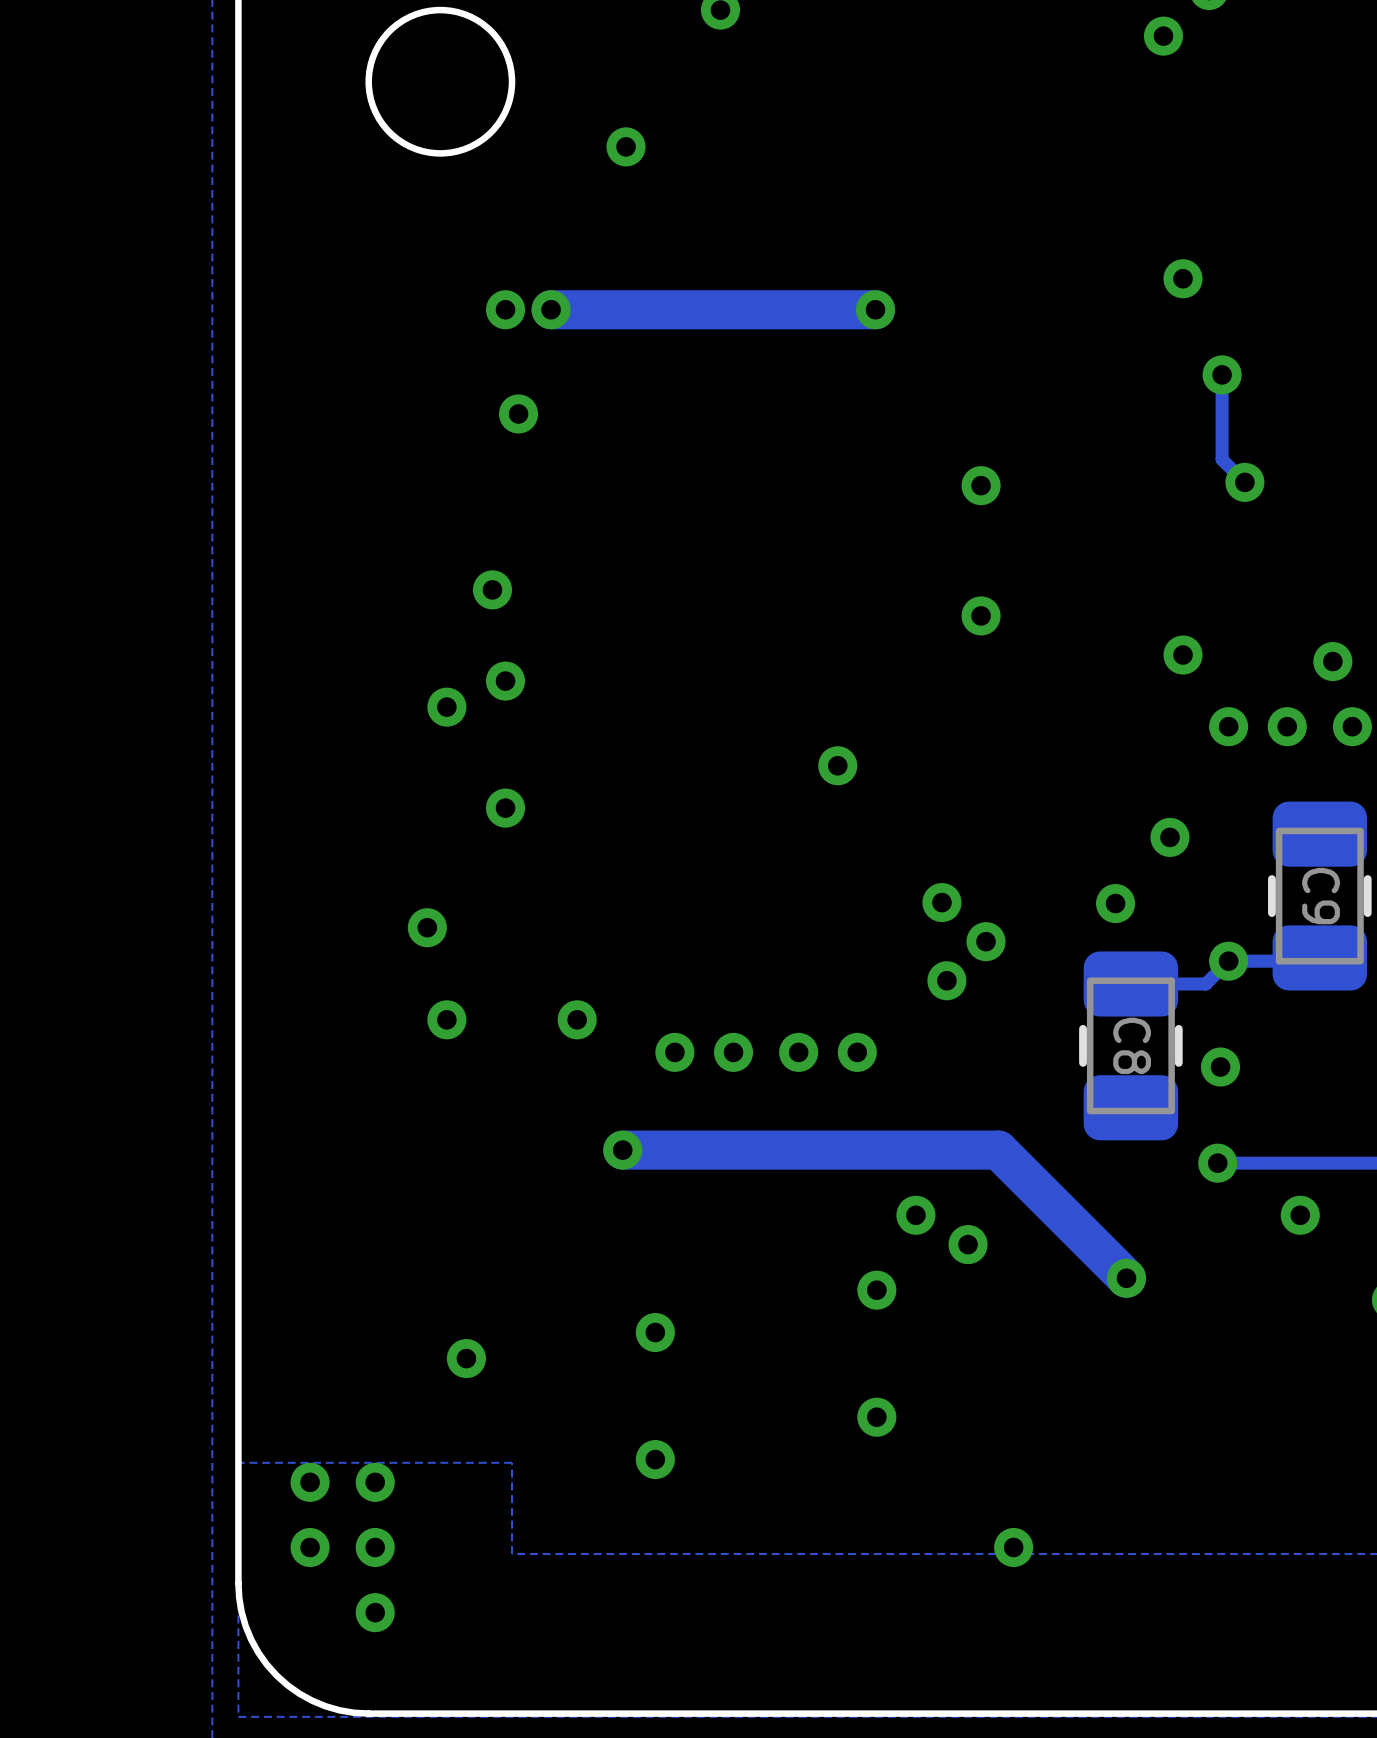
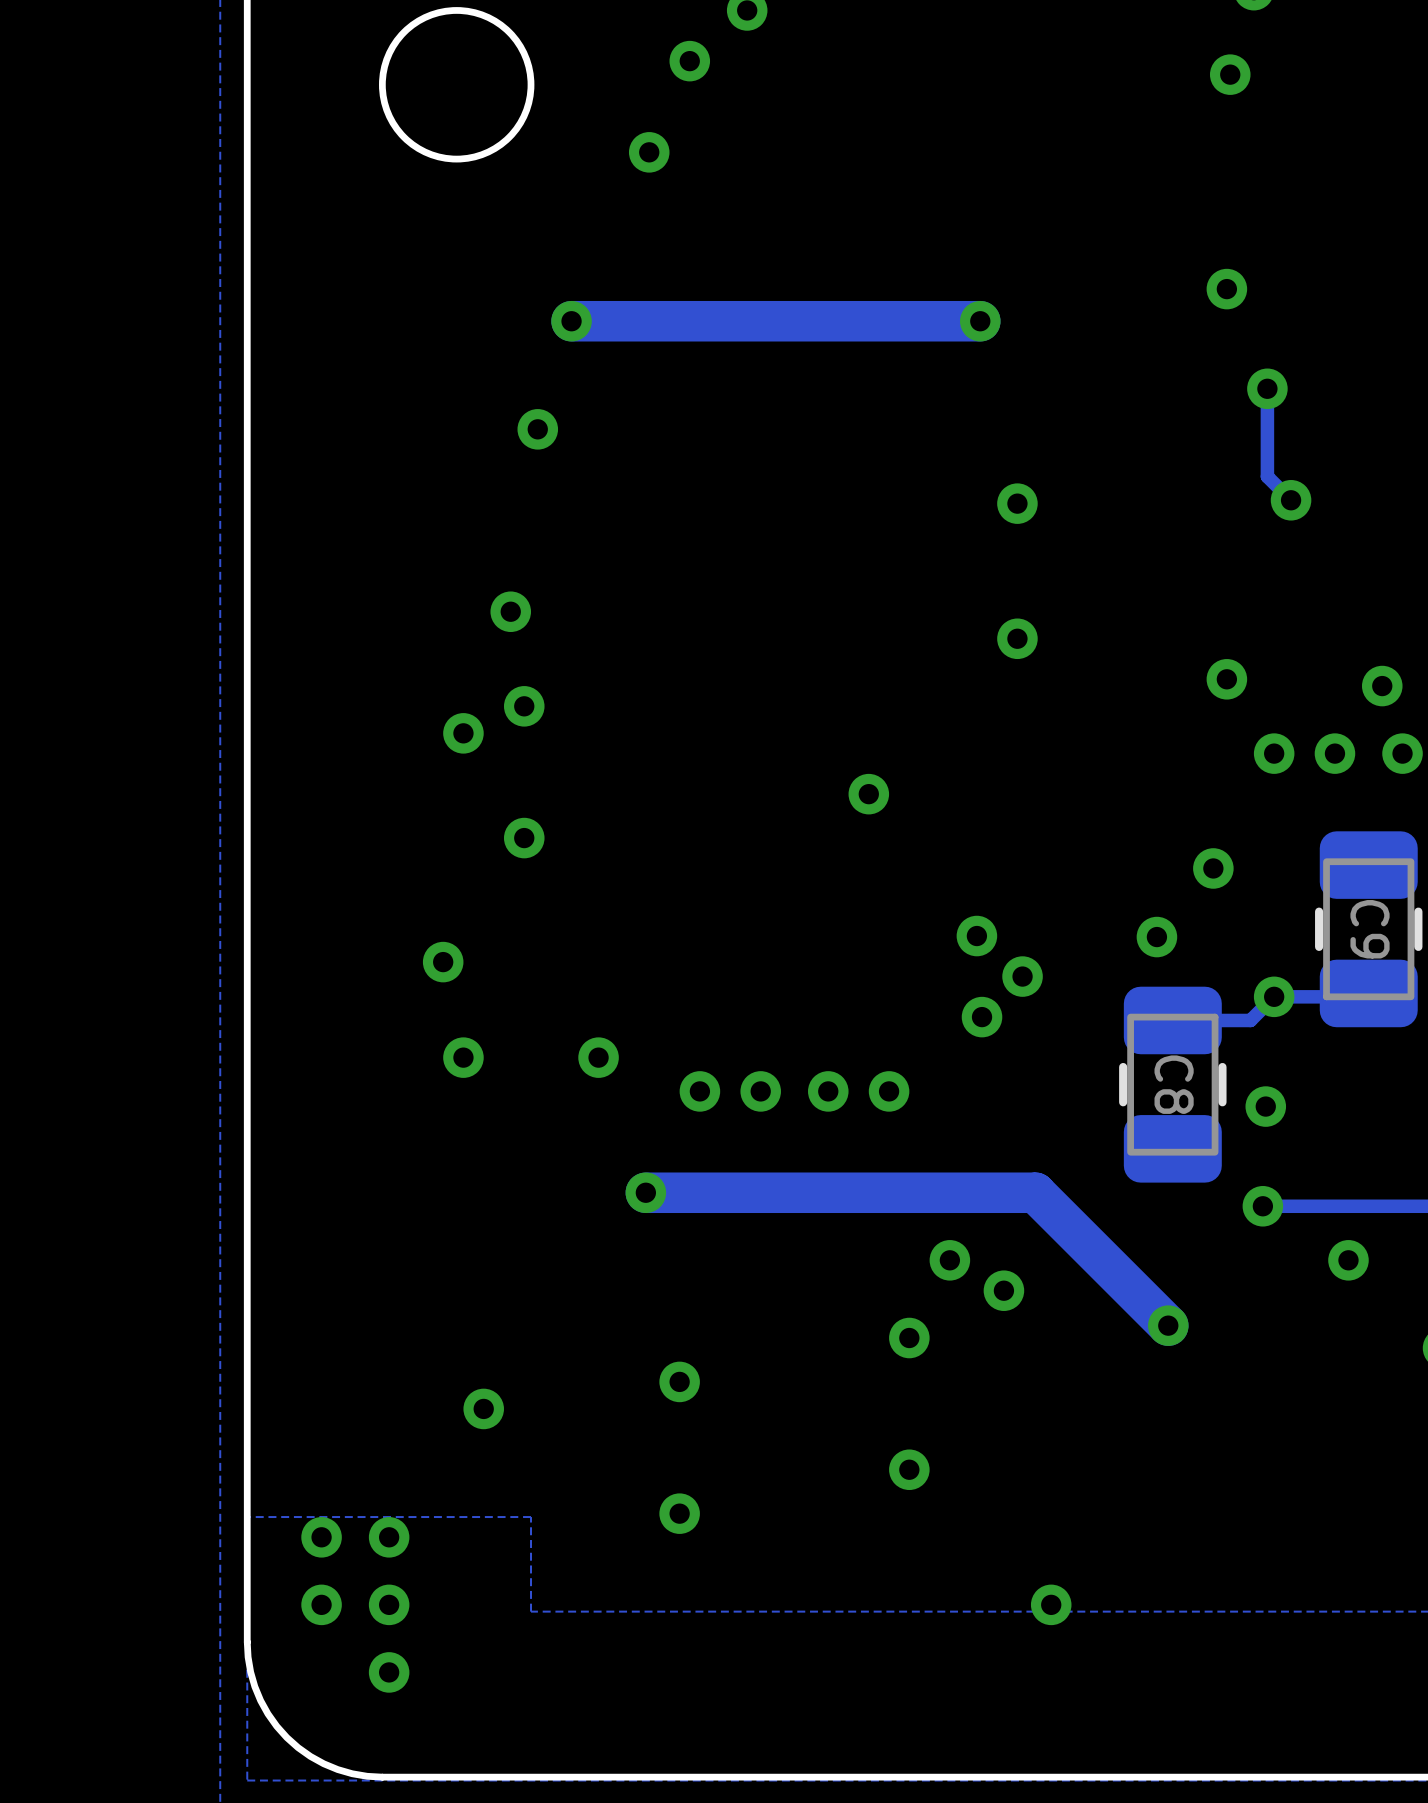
via position: (1163, 36) -> (1230, 74)
via: none -> (689, 61)
via: (505, 309) -> none
via position: (875, 309) -> (980, 321)
track: none -> (980, 321) (907, 321)

